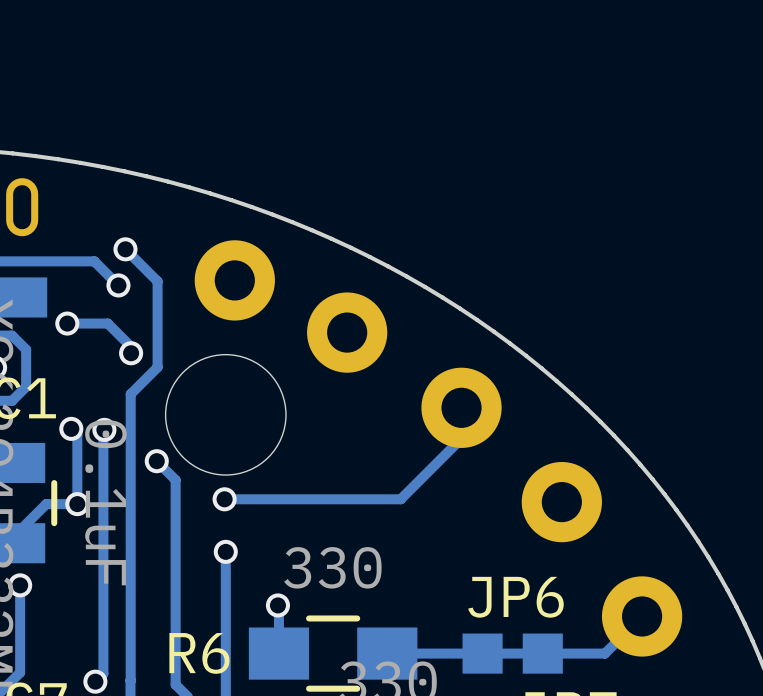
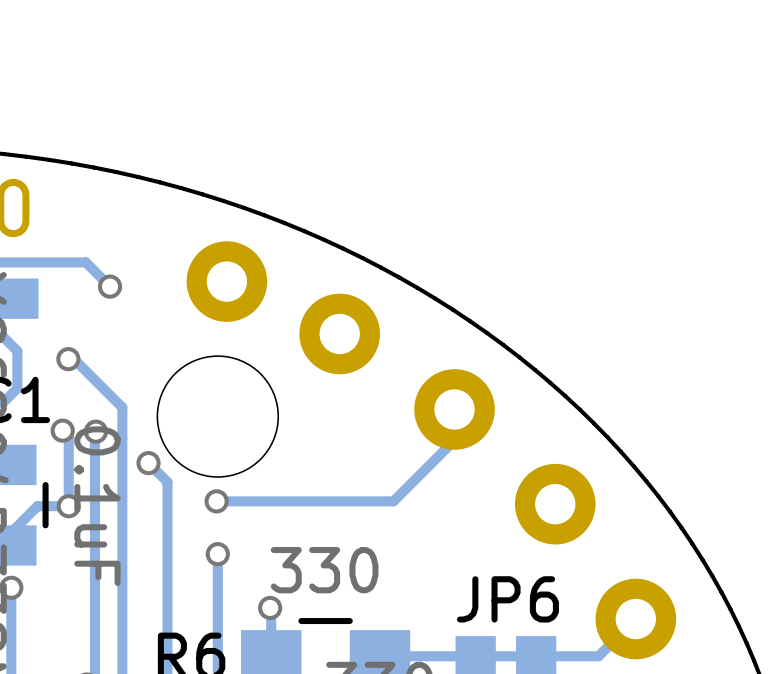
track: (125, 249) (157, 281) (157, 367) (130, 394) (130, 405) -> (68, 359) (73, 359) (122, 407)
via: (125, 249) -> none
track: (67, 323) (107, 323) (131, 346) (131, 353) -> none
via: (67, 323) -> none
via: (131, 353) -> none
via: none -> (68, 359)

